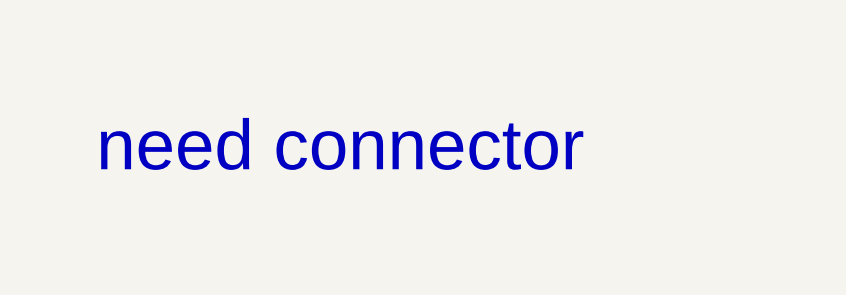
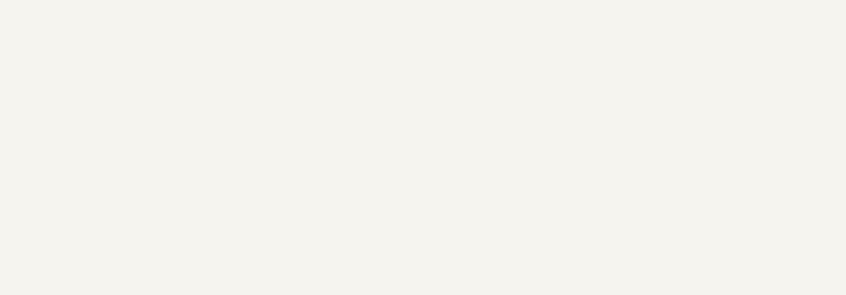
text: need connector (342, 143) -> none

